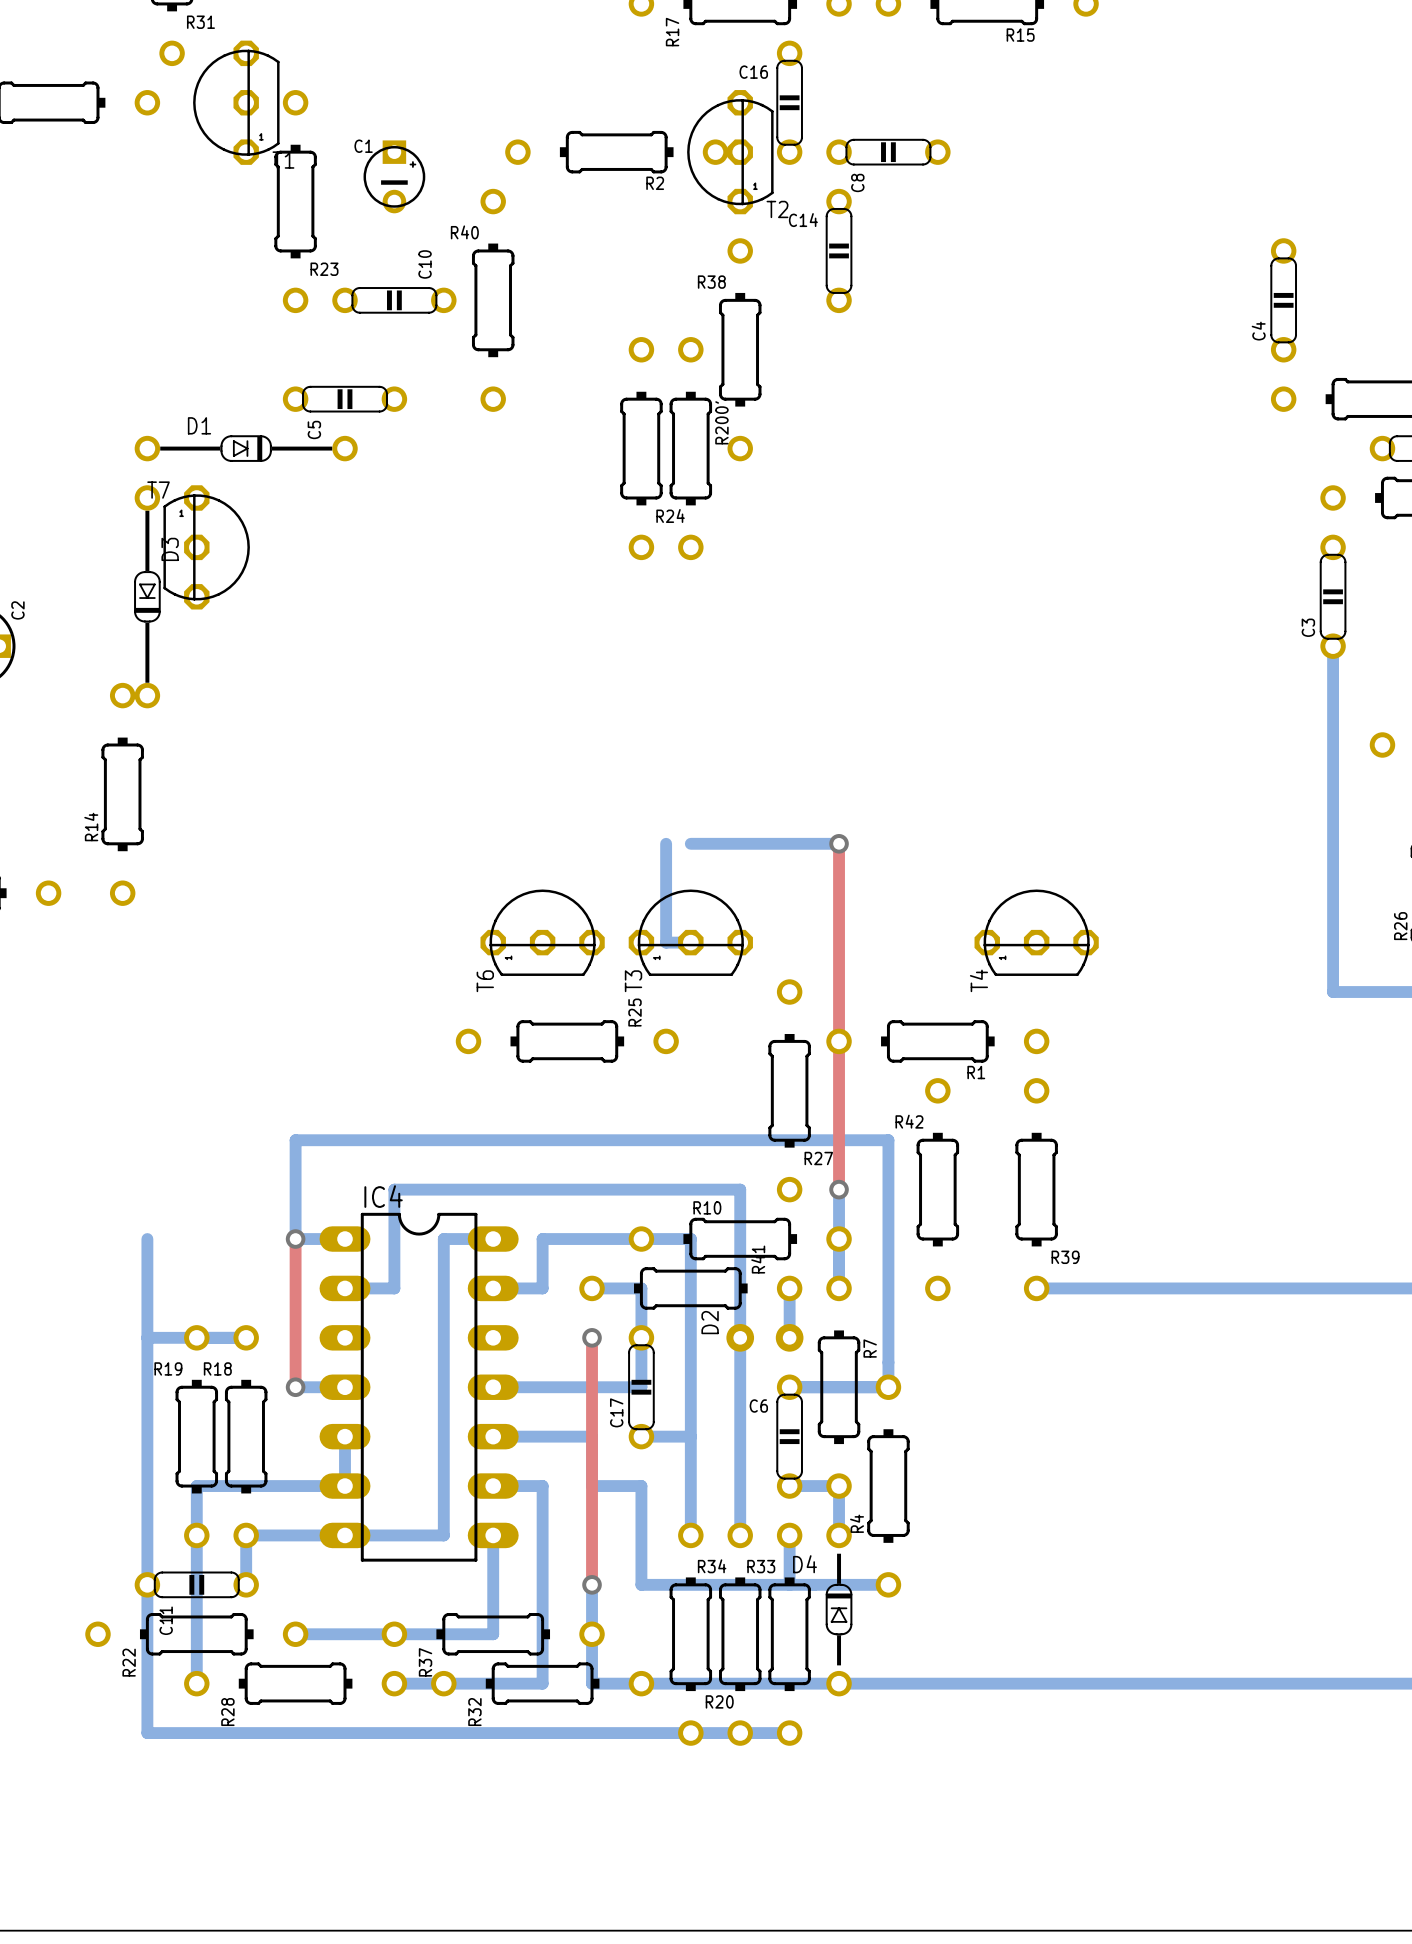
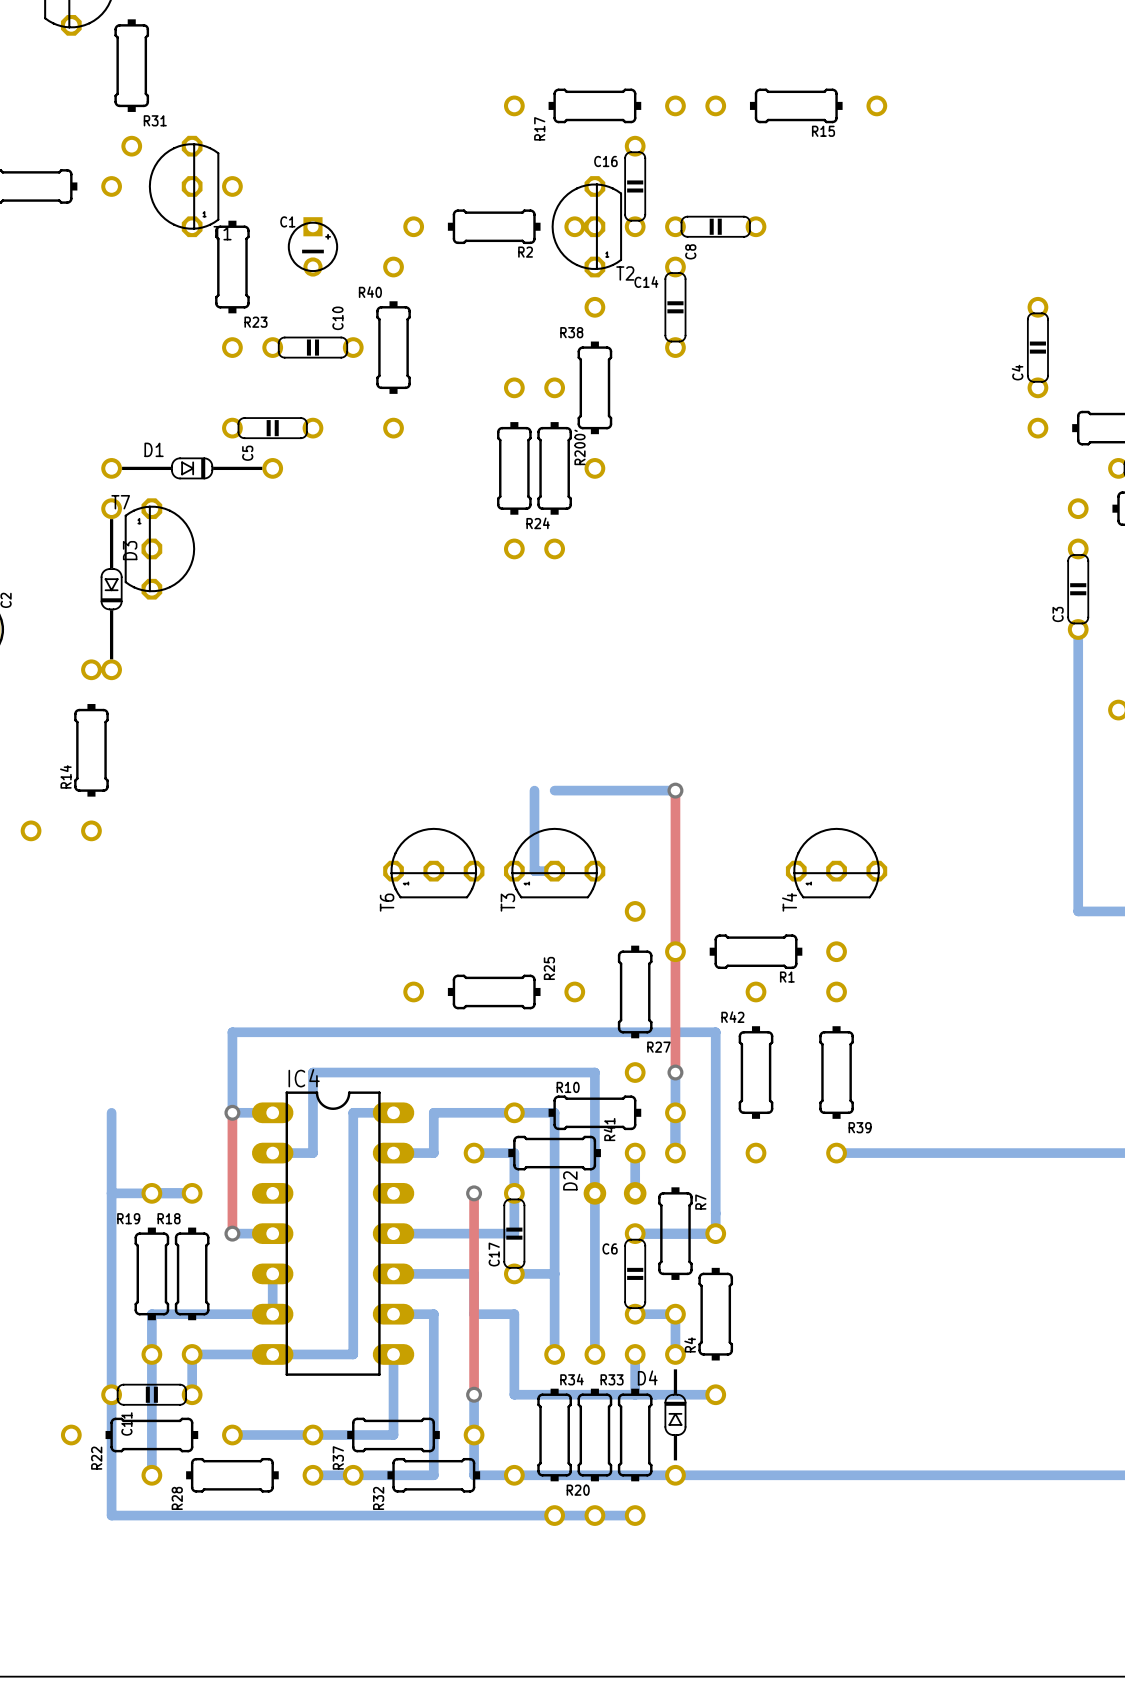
R25 position: (567, 1041) -> (494, 991)

